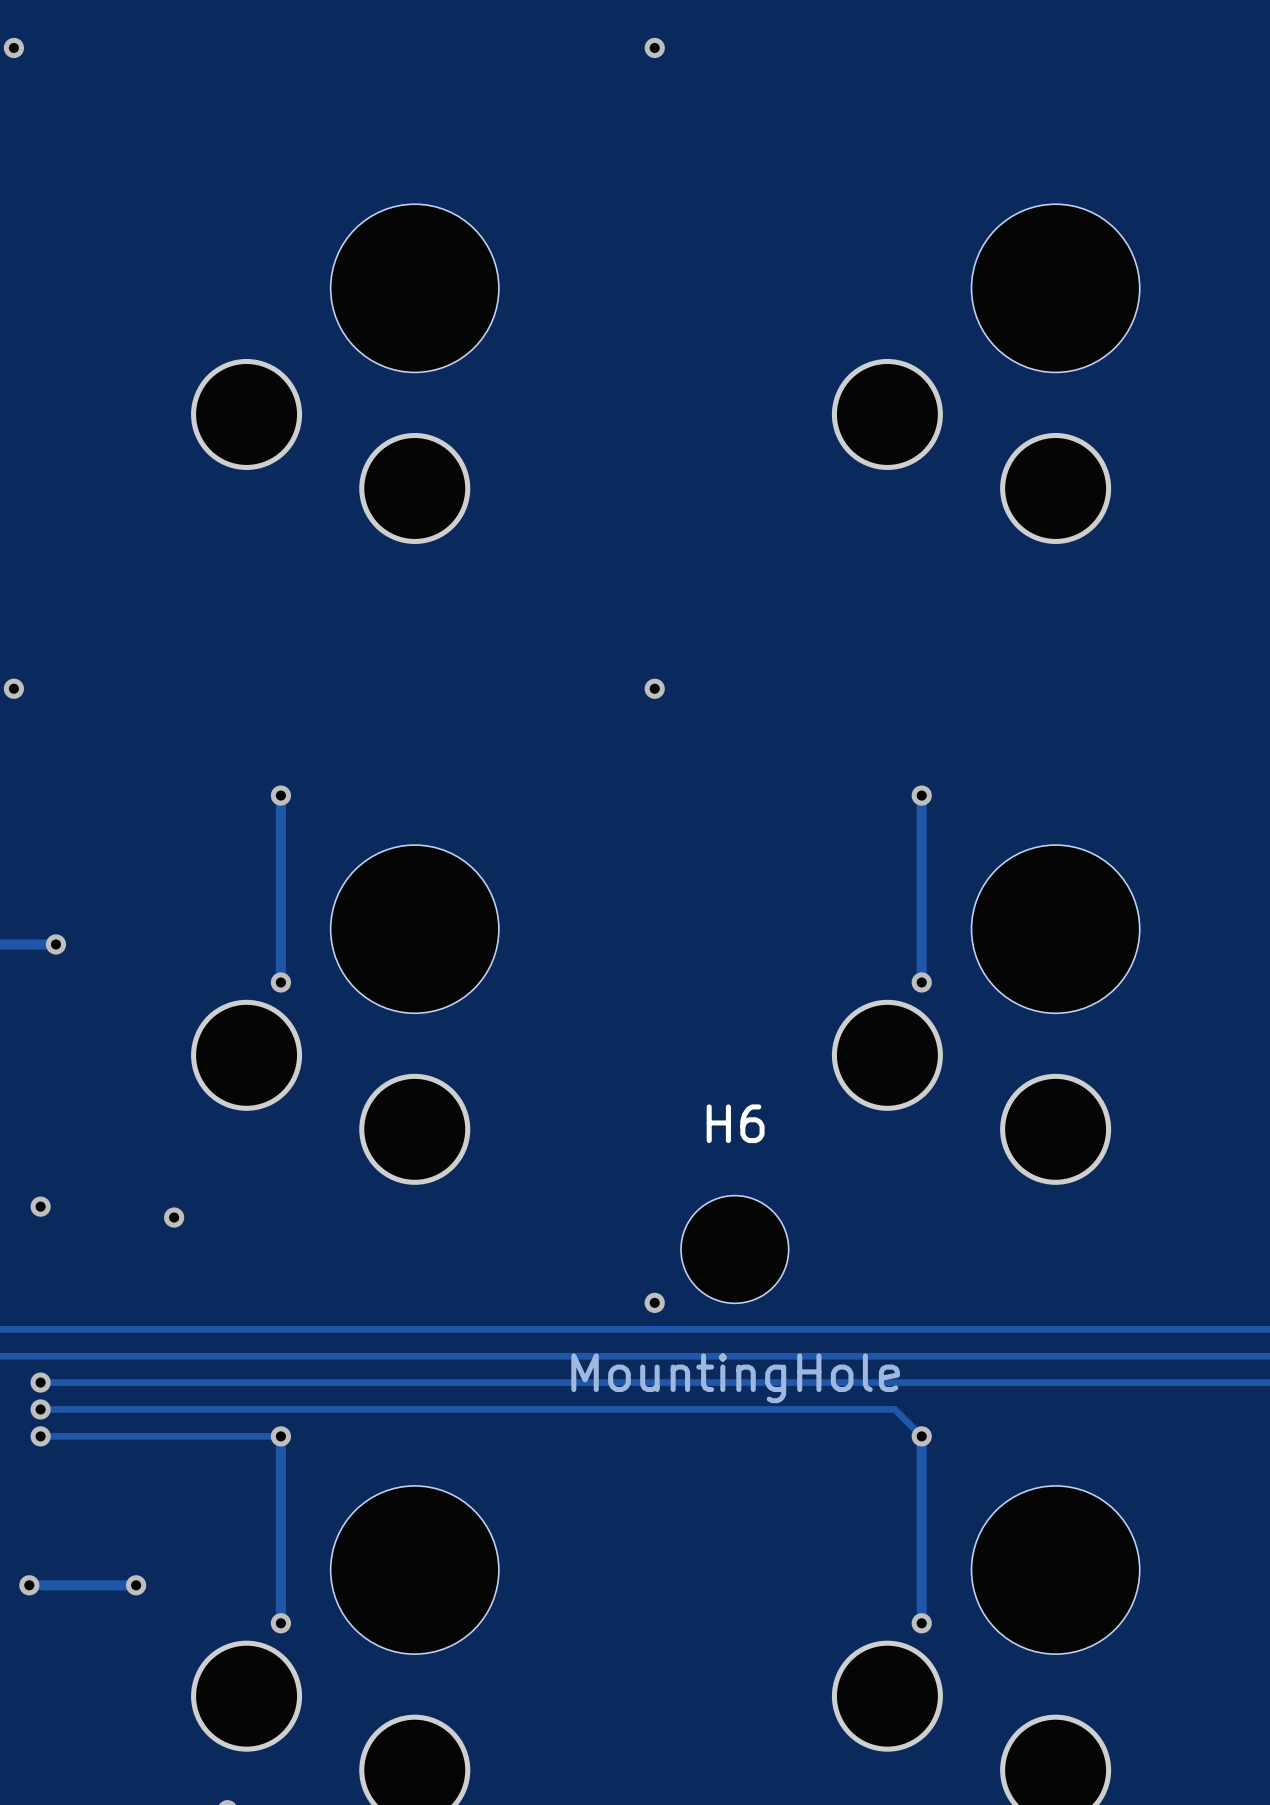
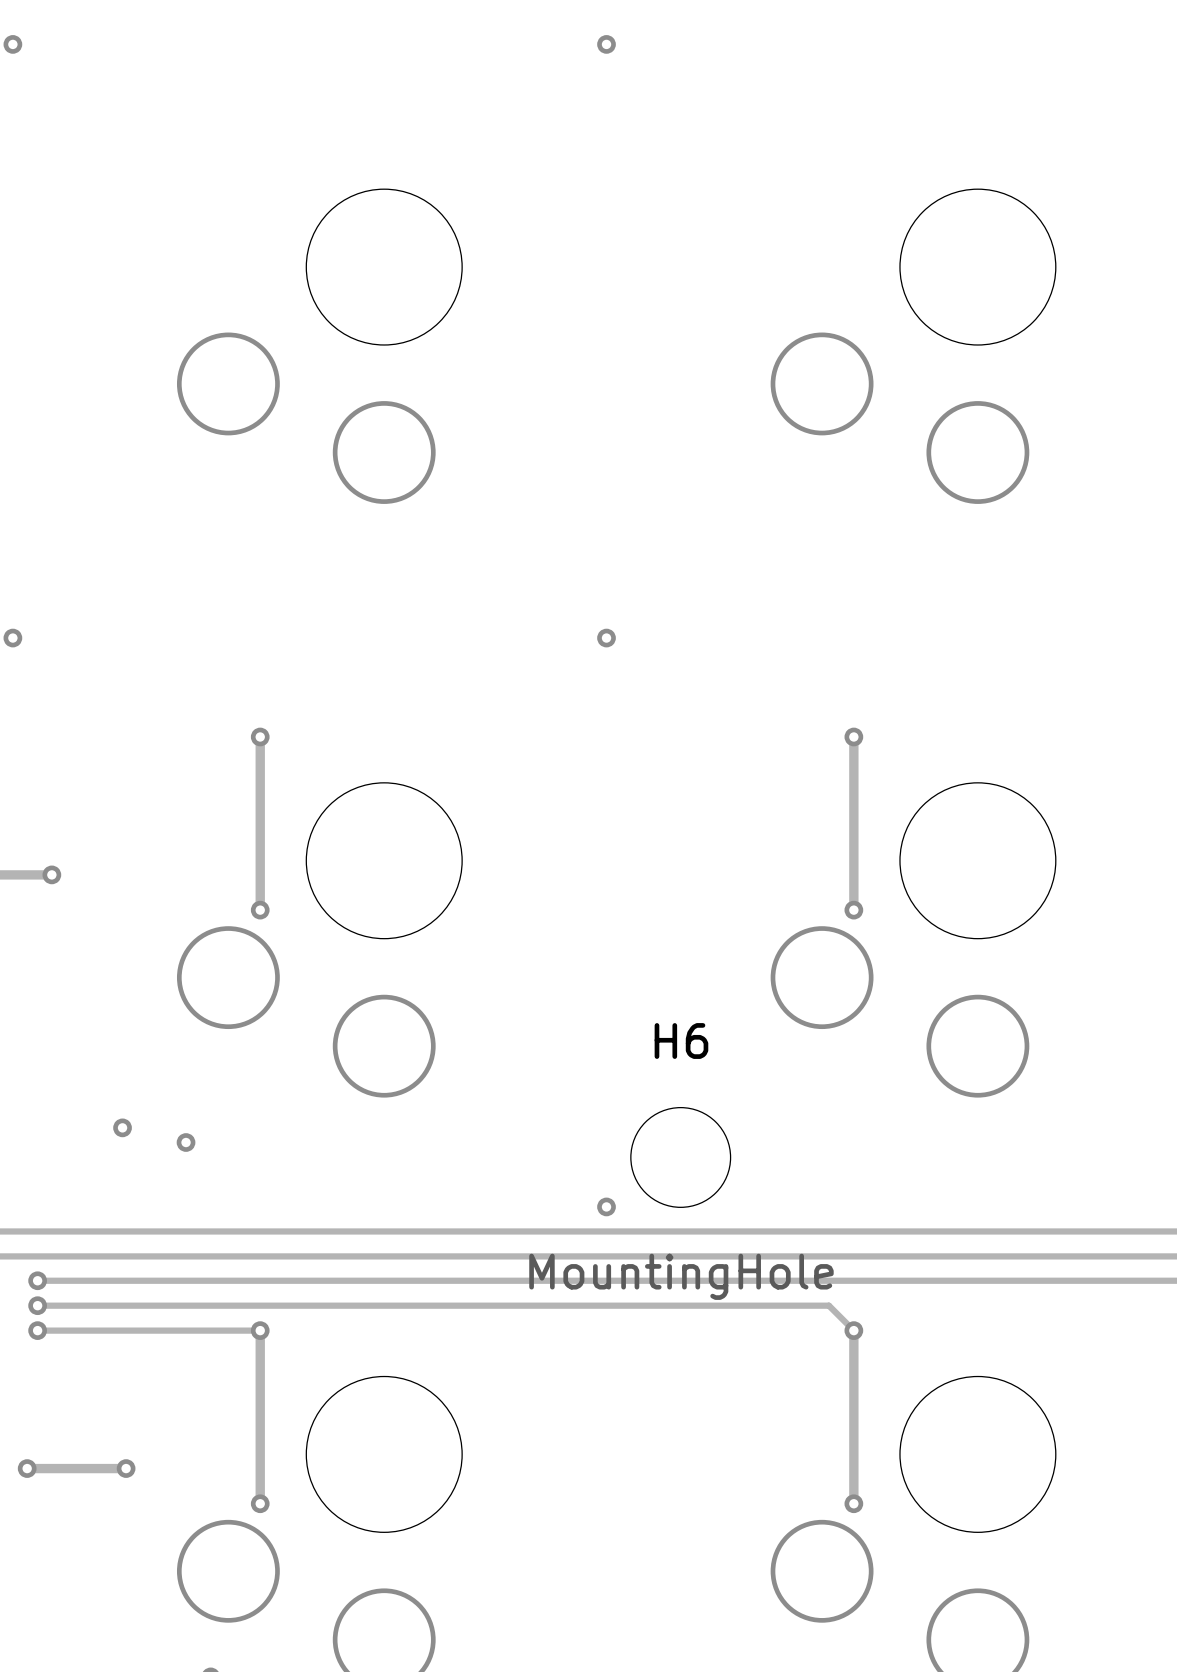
via: (40, 1206) -> none
via: none -> (122, 1127)
via: (174, 1217) -> none
via: none -> (186, 1142)

